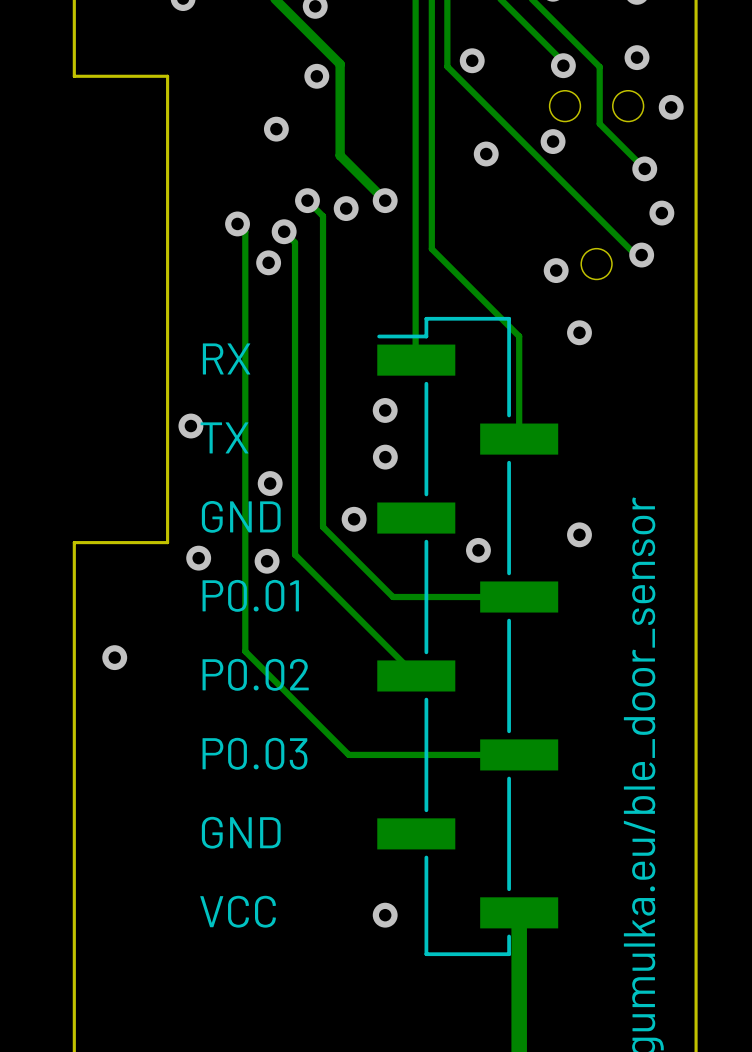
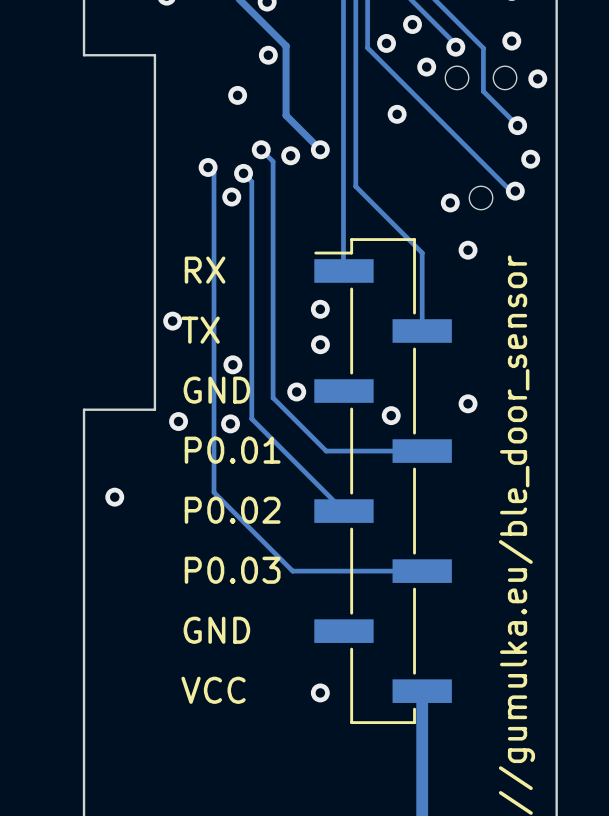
via: none -> (412, 24)
via position: (553, 141) -> (426, 67)

